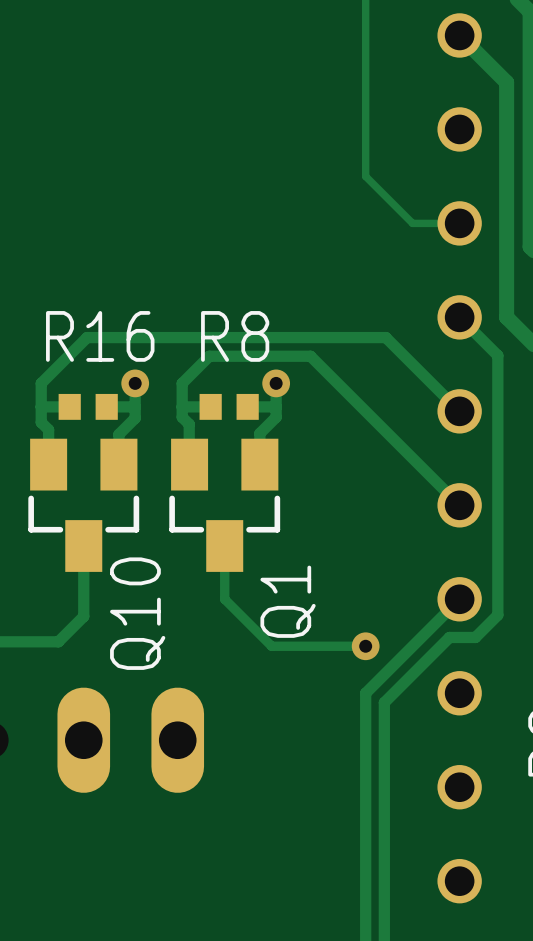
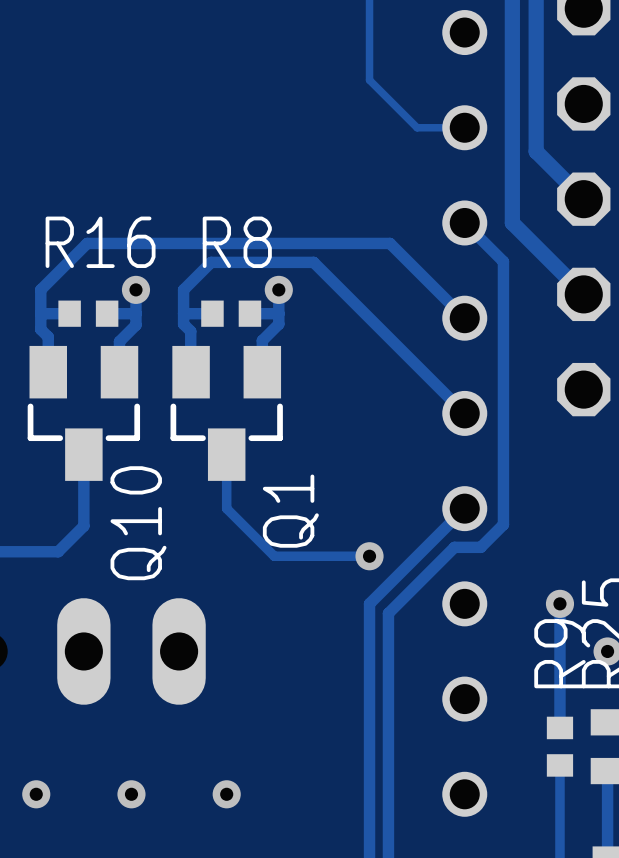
via: none -> (36, 794)
via: none -> (131, 794)
via: none -> (226, 794)

